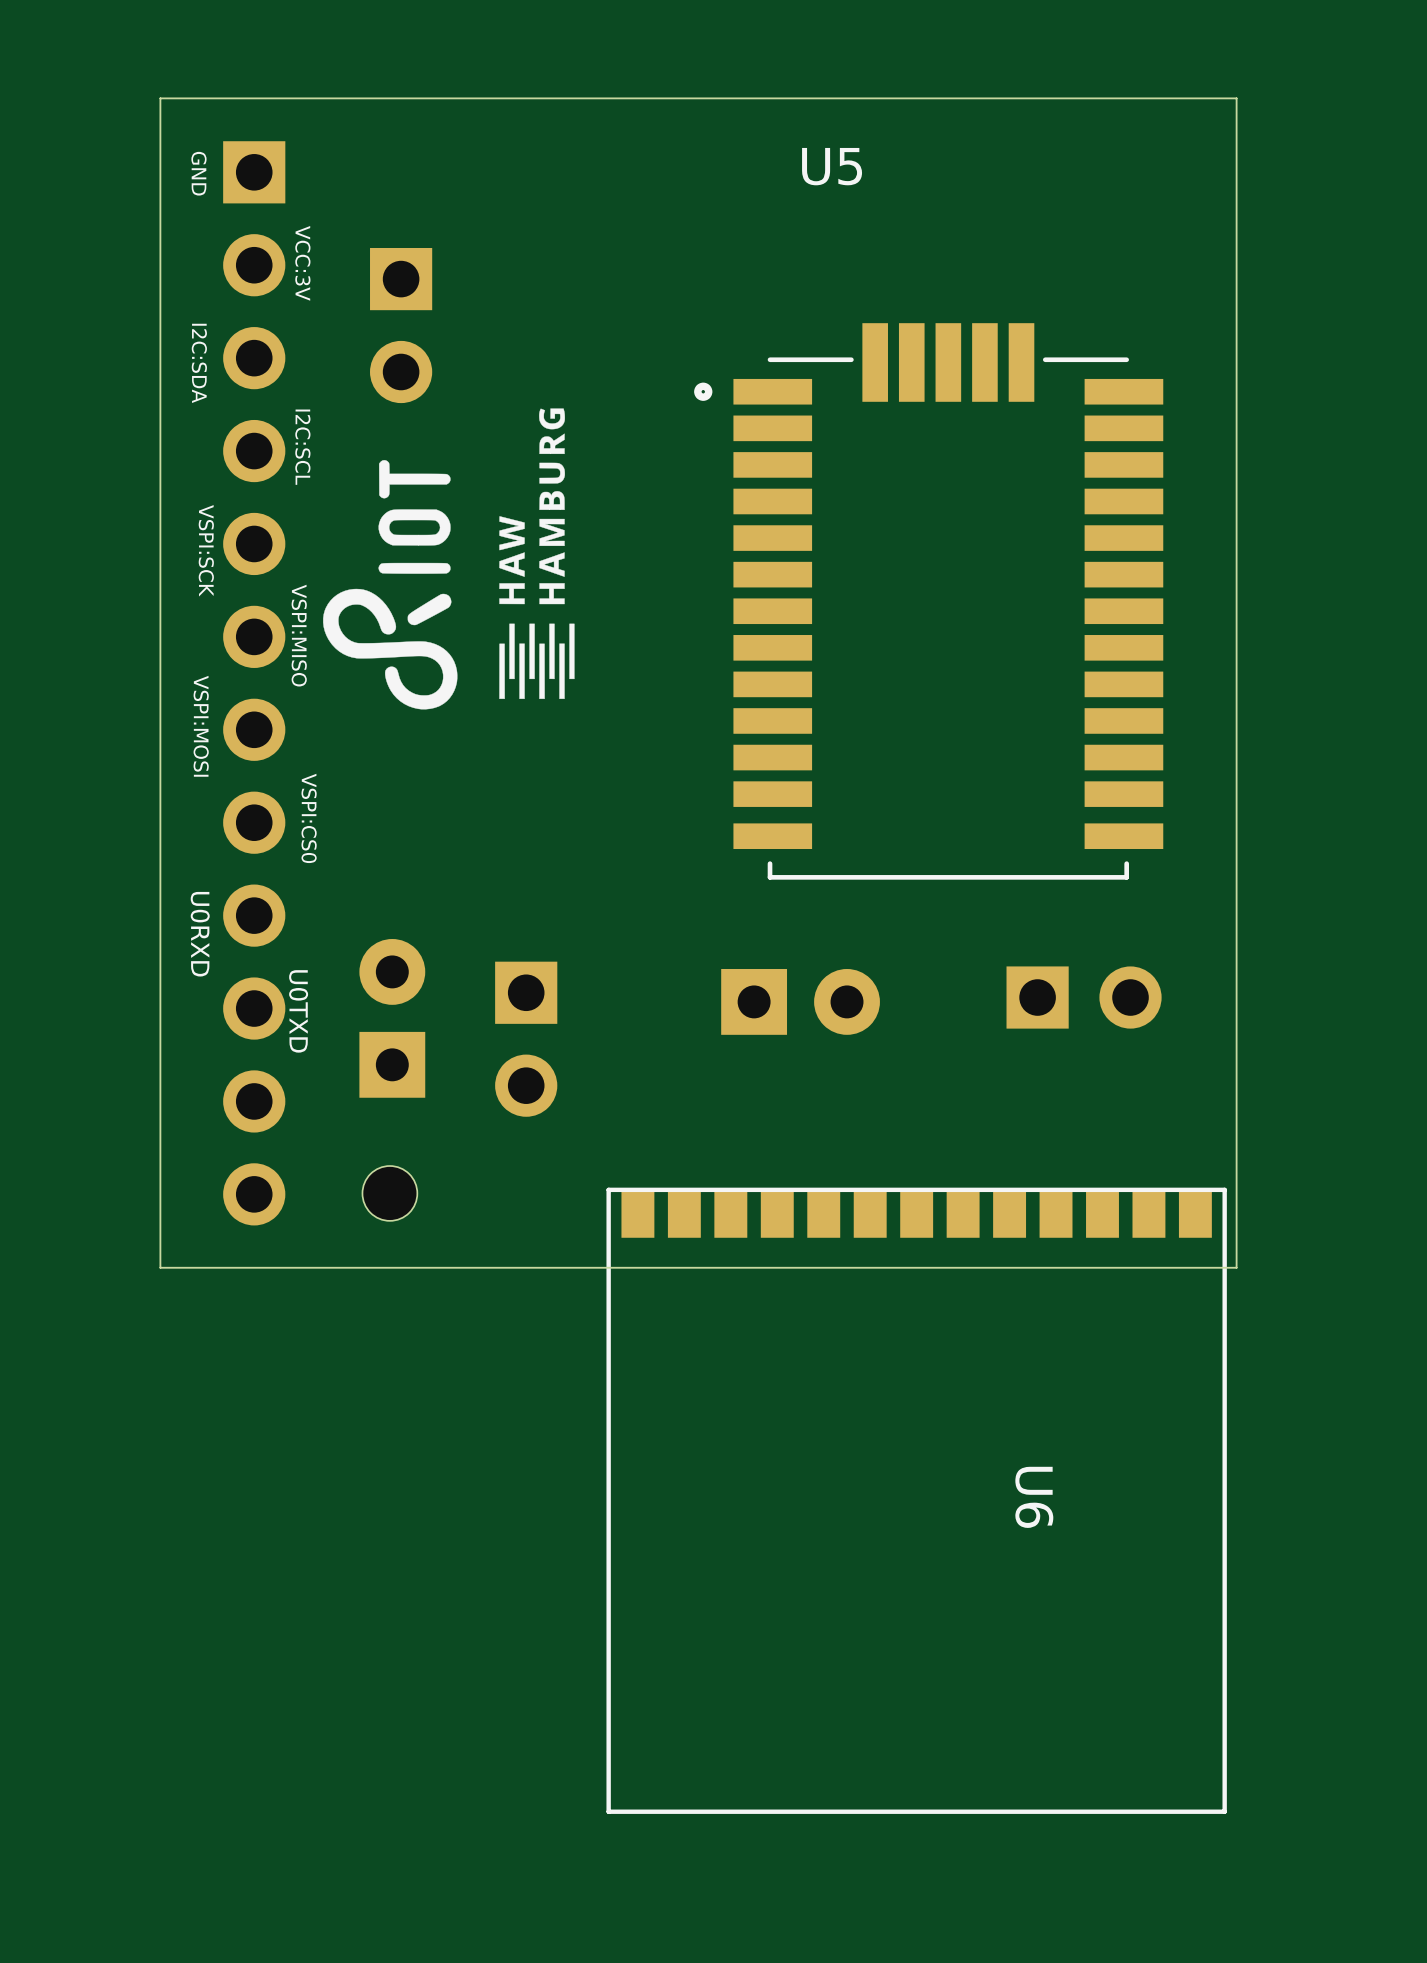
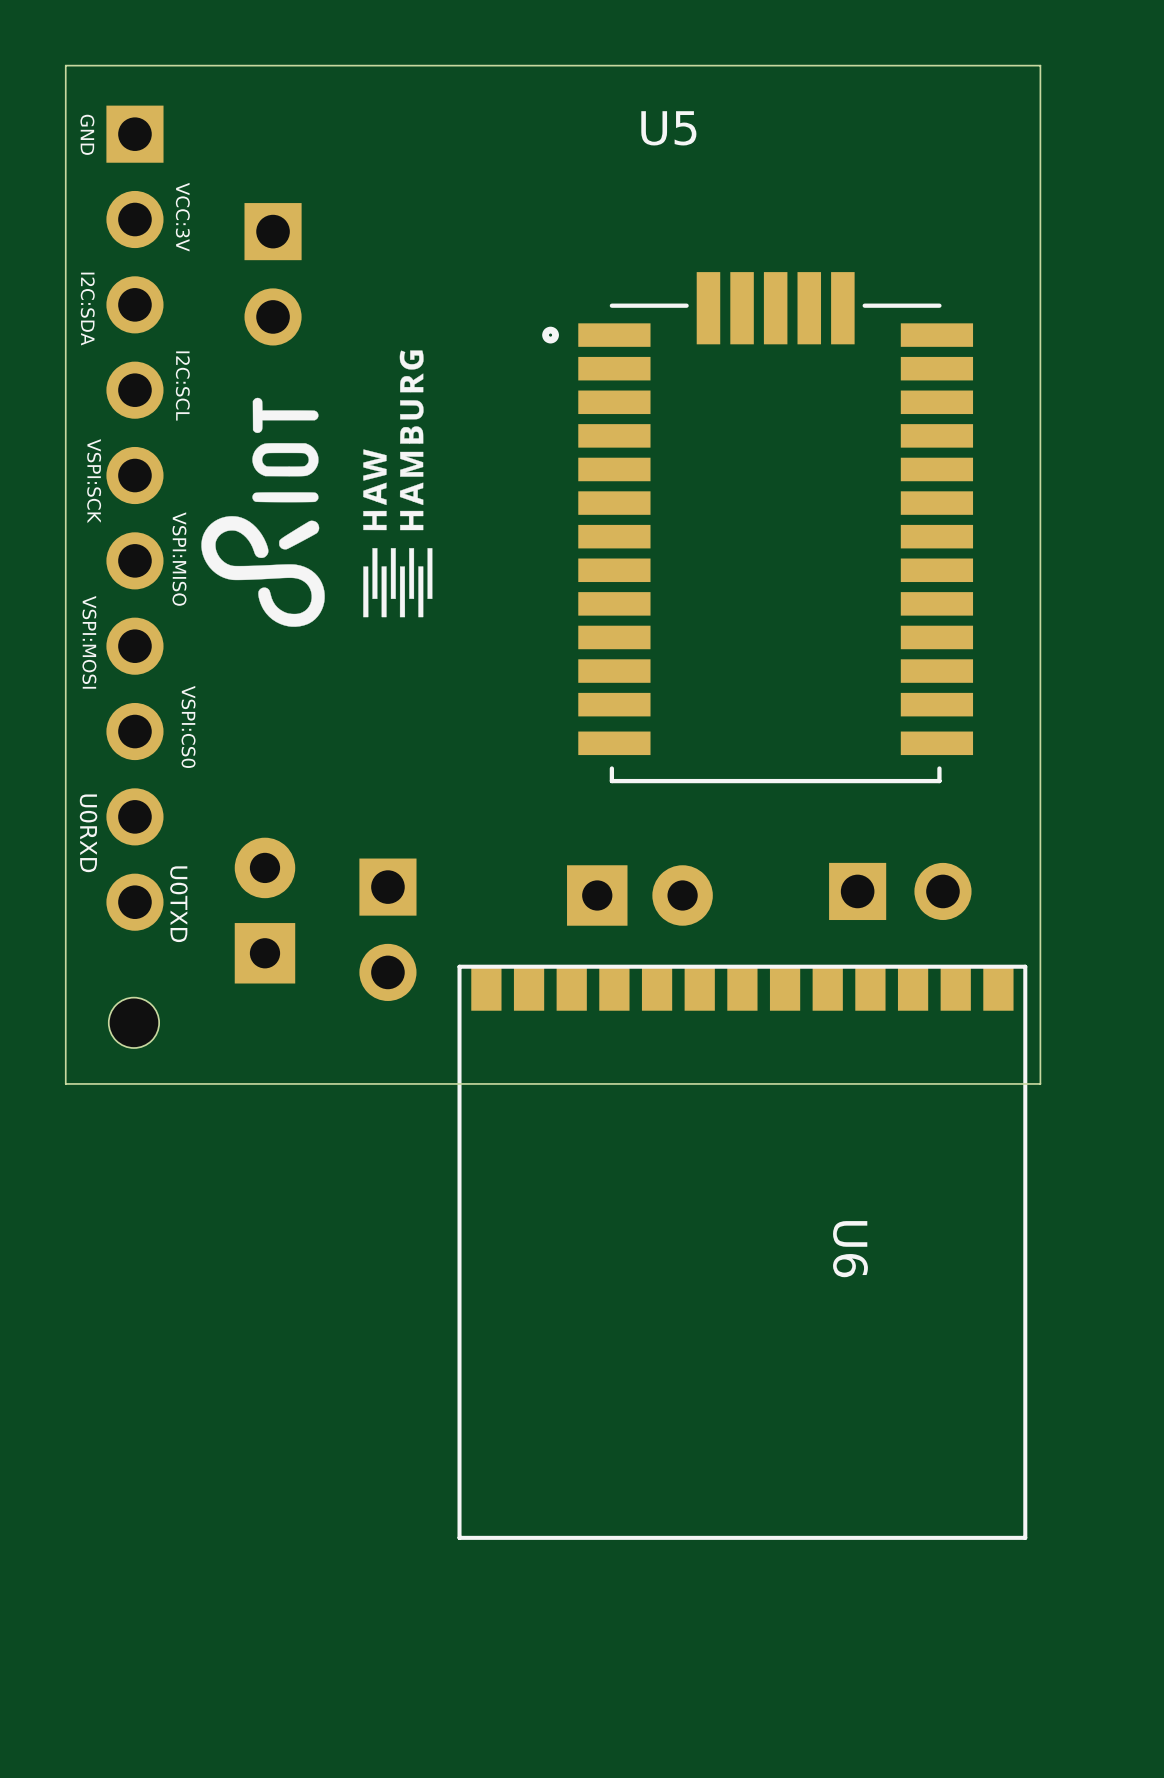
board edge: (175, 98) (160, 98) (160, 1267) (1236, 1267) (1236, 1207) -> (65, 65) (65, 1083) (1040, 1083)
part: none -> (134, 518)
part: (254, 683) -> none
part position: (389, 1193) -> (133, 1022)
U6 position: (916, 1500) -> (742, 1252)

